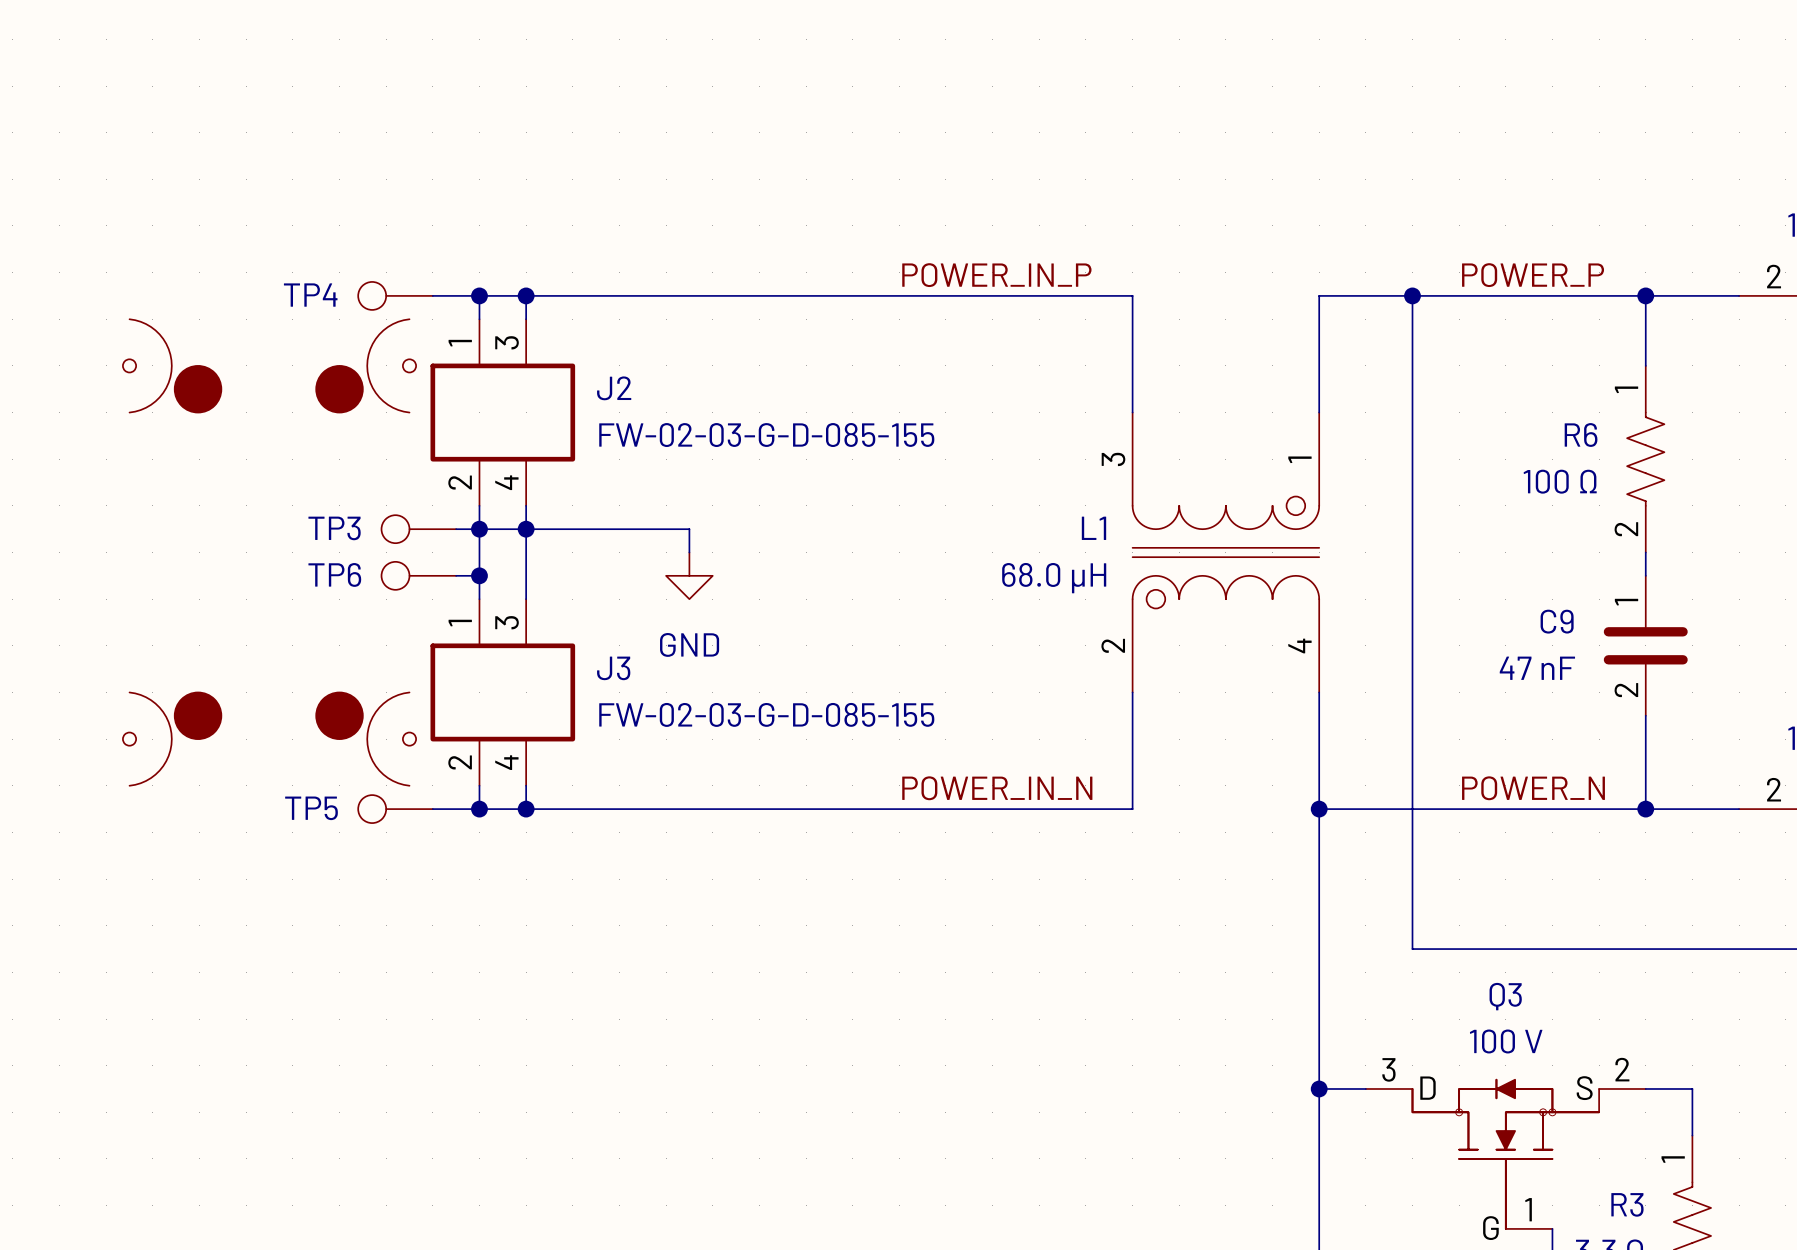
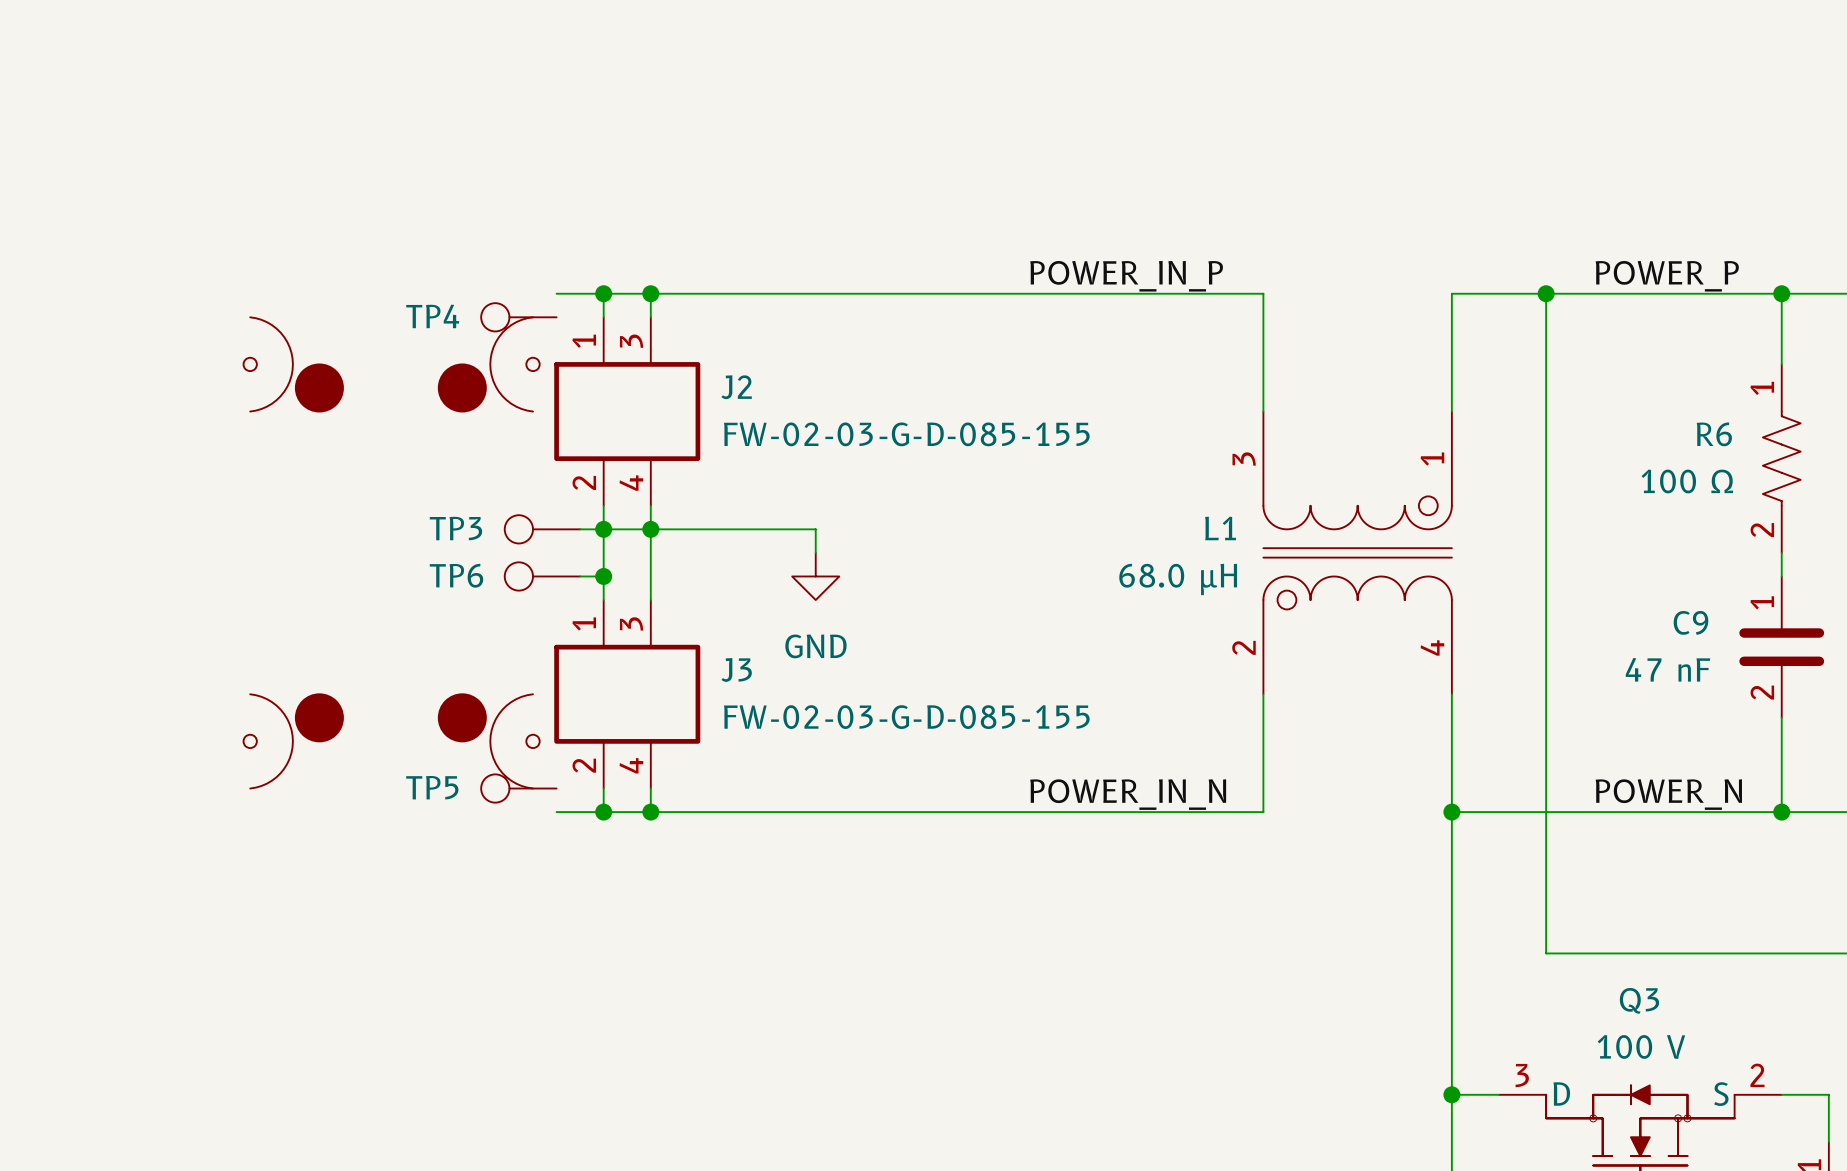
TP4 position: (395, 295) -> (518, 317)
TP5 position: (395, 809) -> (518, 788)

